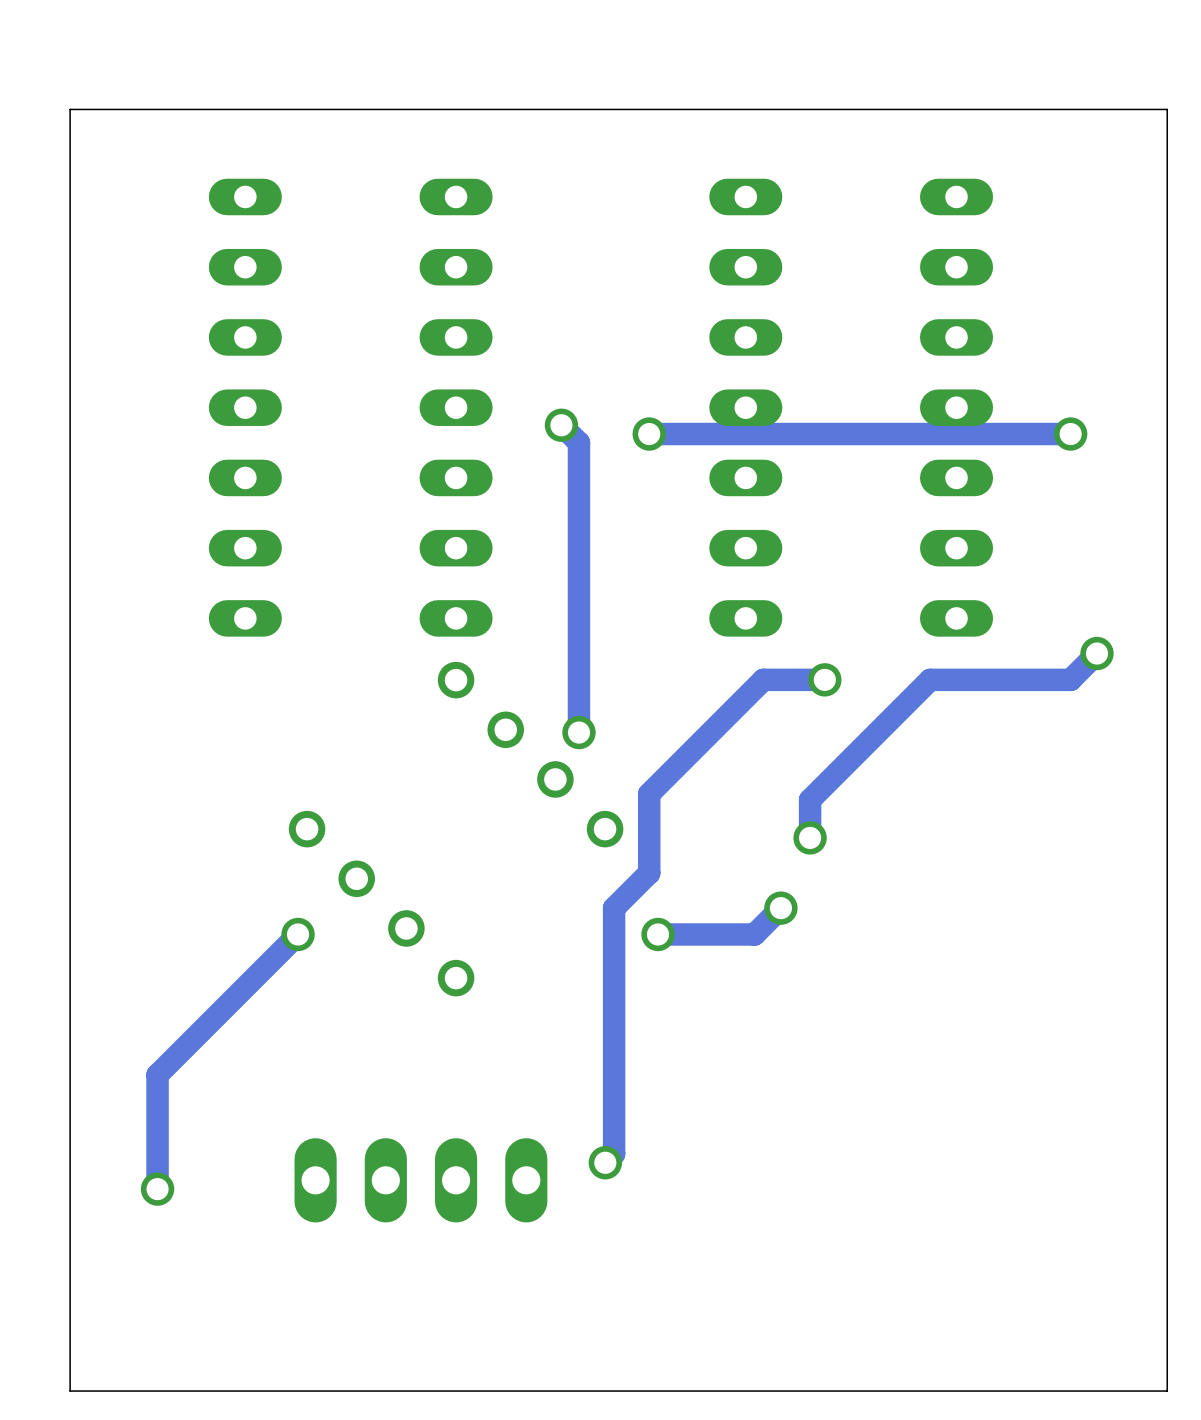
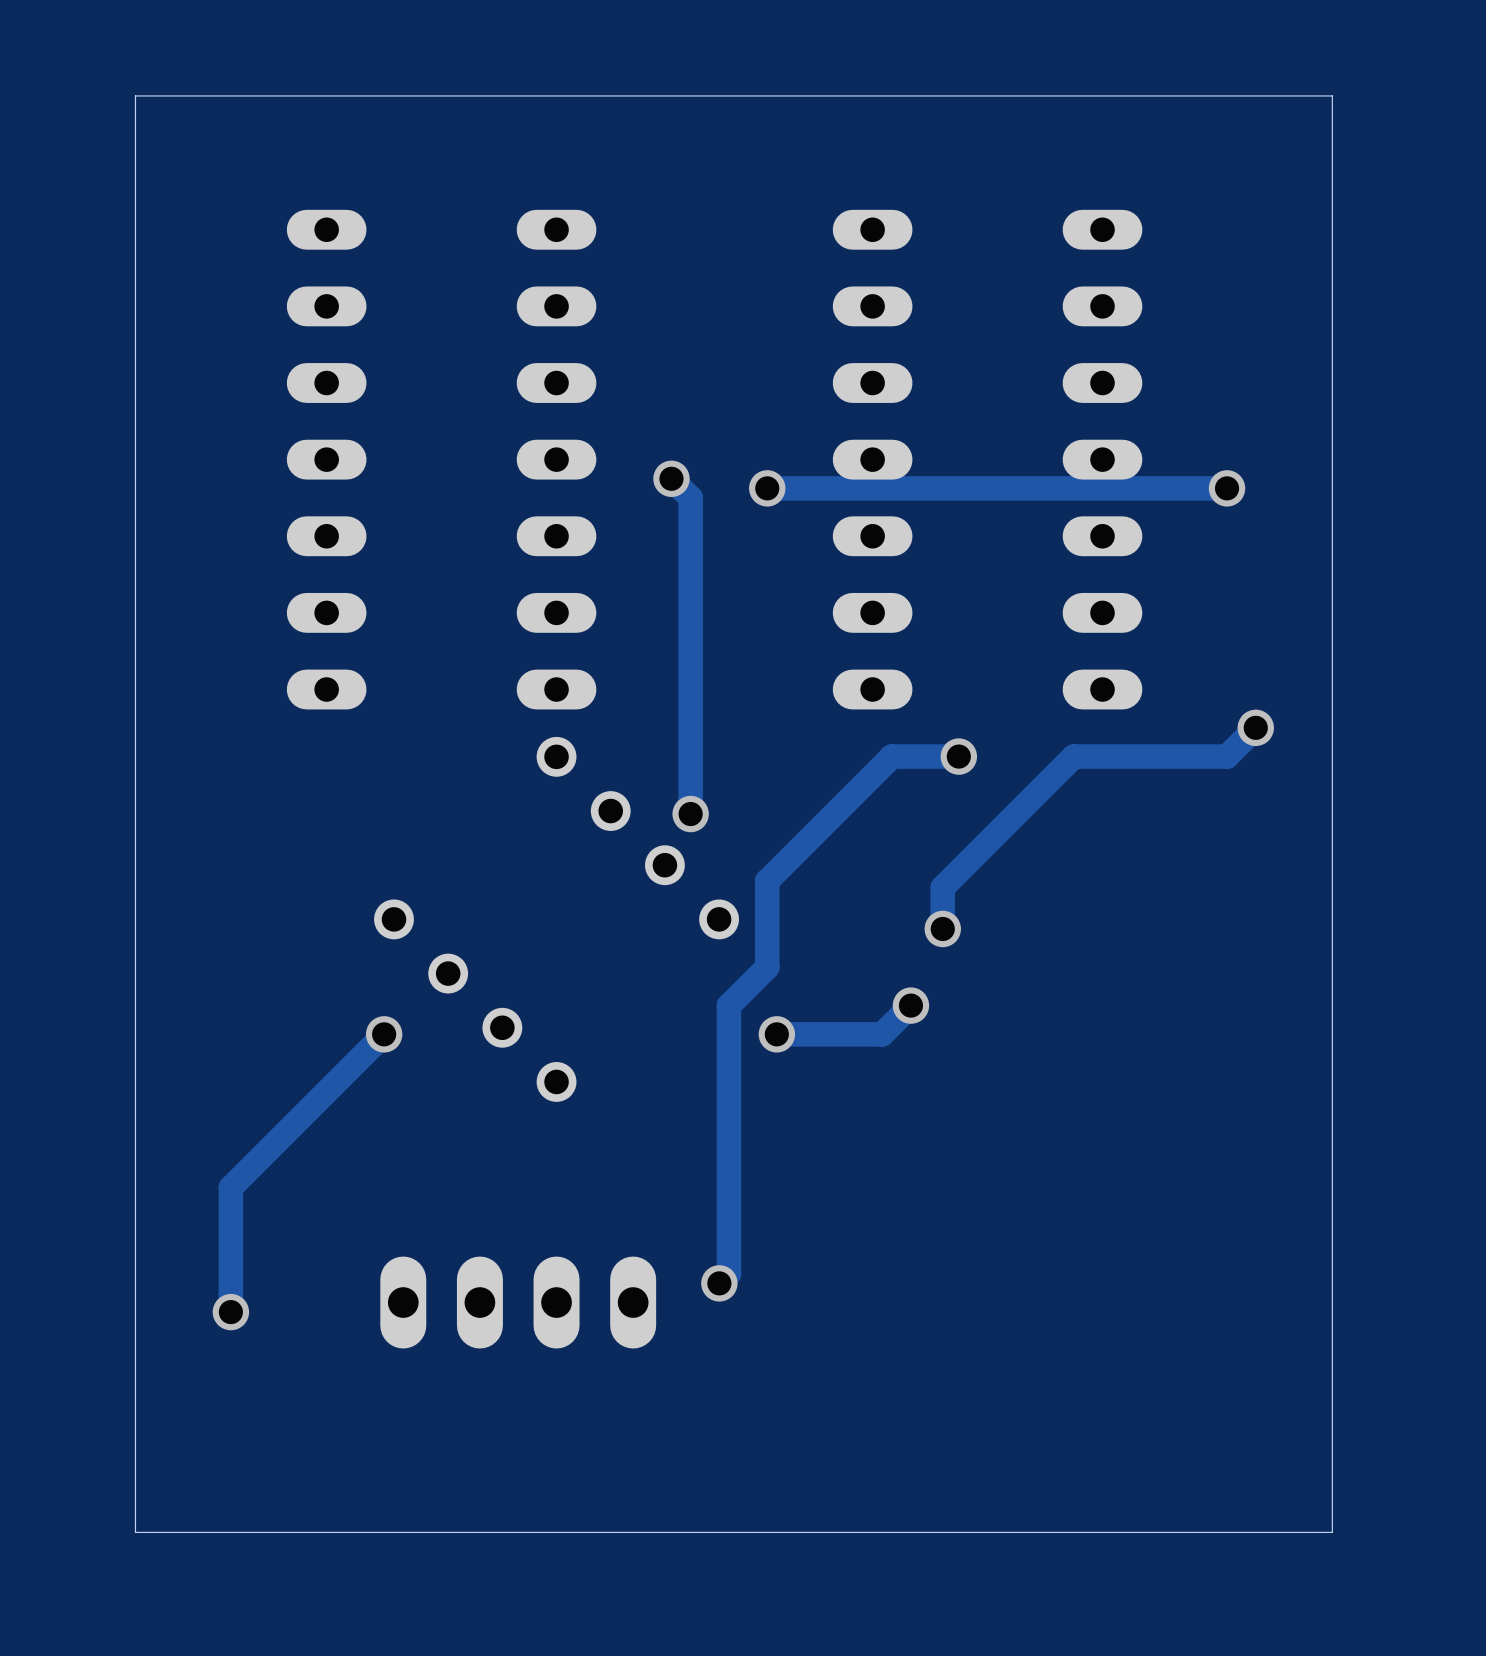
board edge: (1167, 109) (70, 109) -> (1332, 134) (1332, 95) (135, 95) (135, 134)

